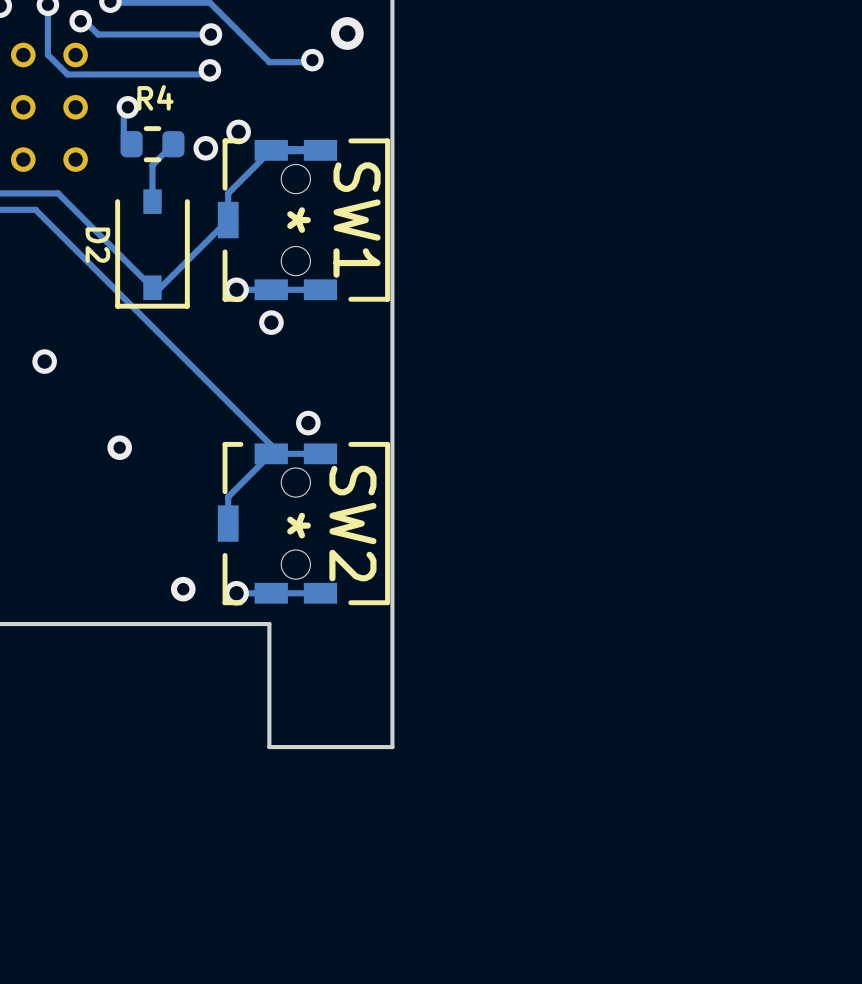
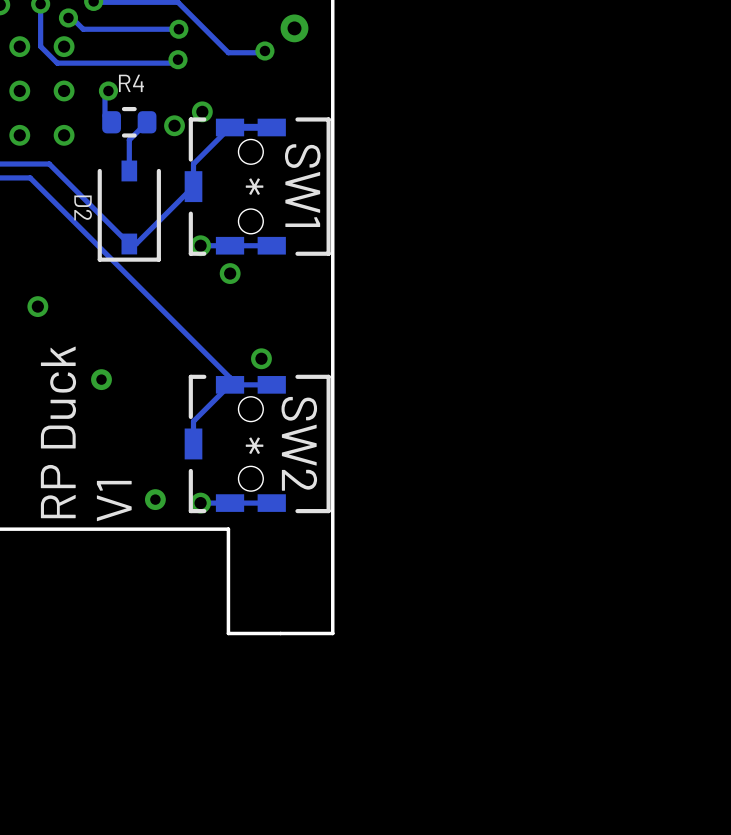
text: none -> RP Duck (58, 432)
text: none -> V1 (114, 501)

